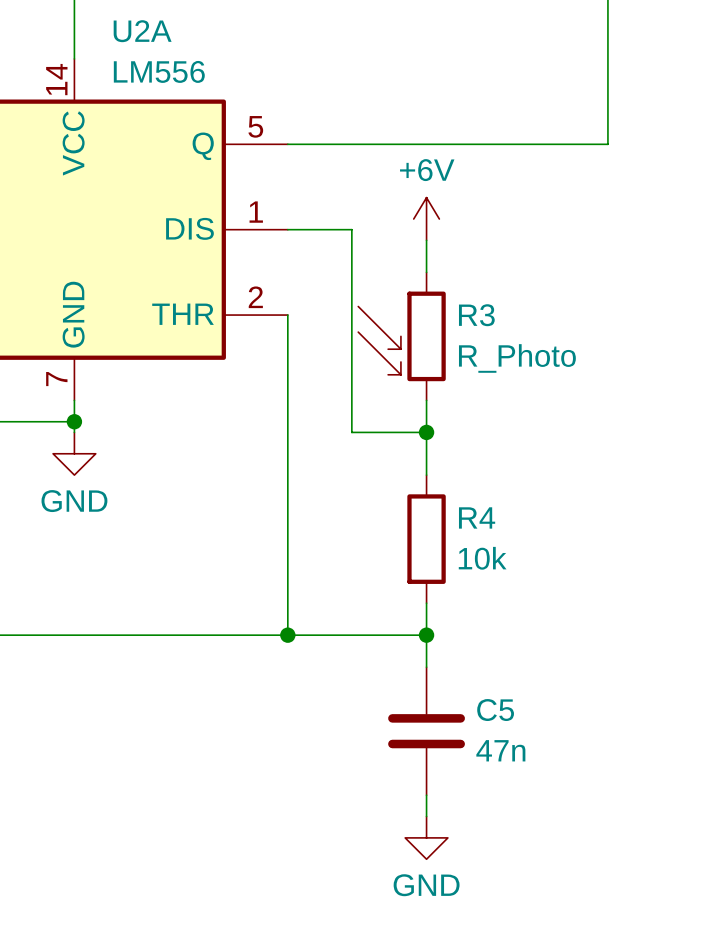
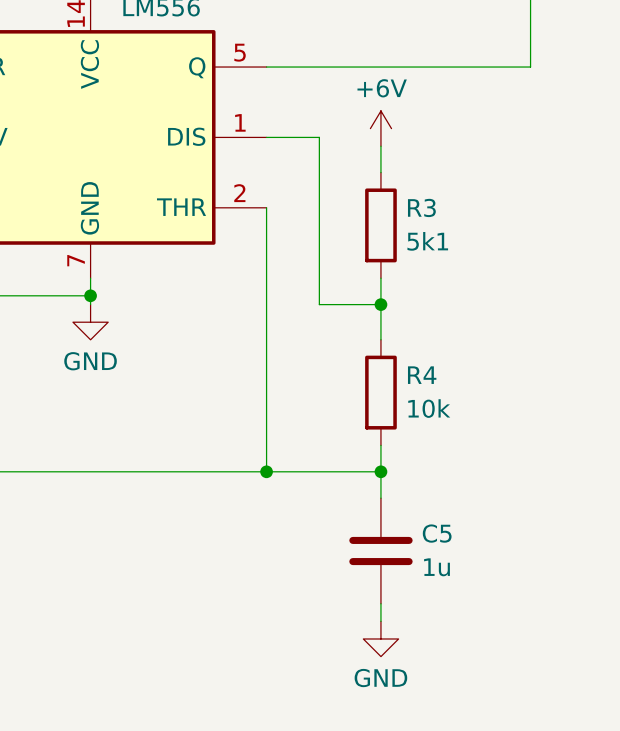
R3 symbol: [358, 272, 446, 401] -> [365, 172, 397, 279]
R3 value: R_Photo (517, 358) -> 5k1 (427, 241)
C5 value: 47n (500, 750) -> 1u (437, 567)

